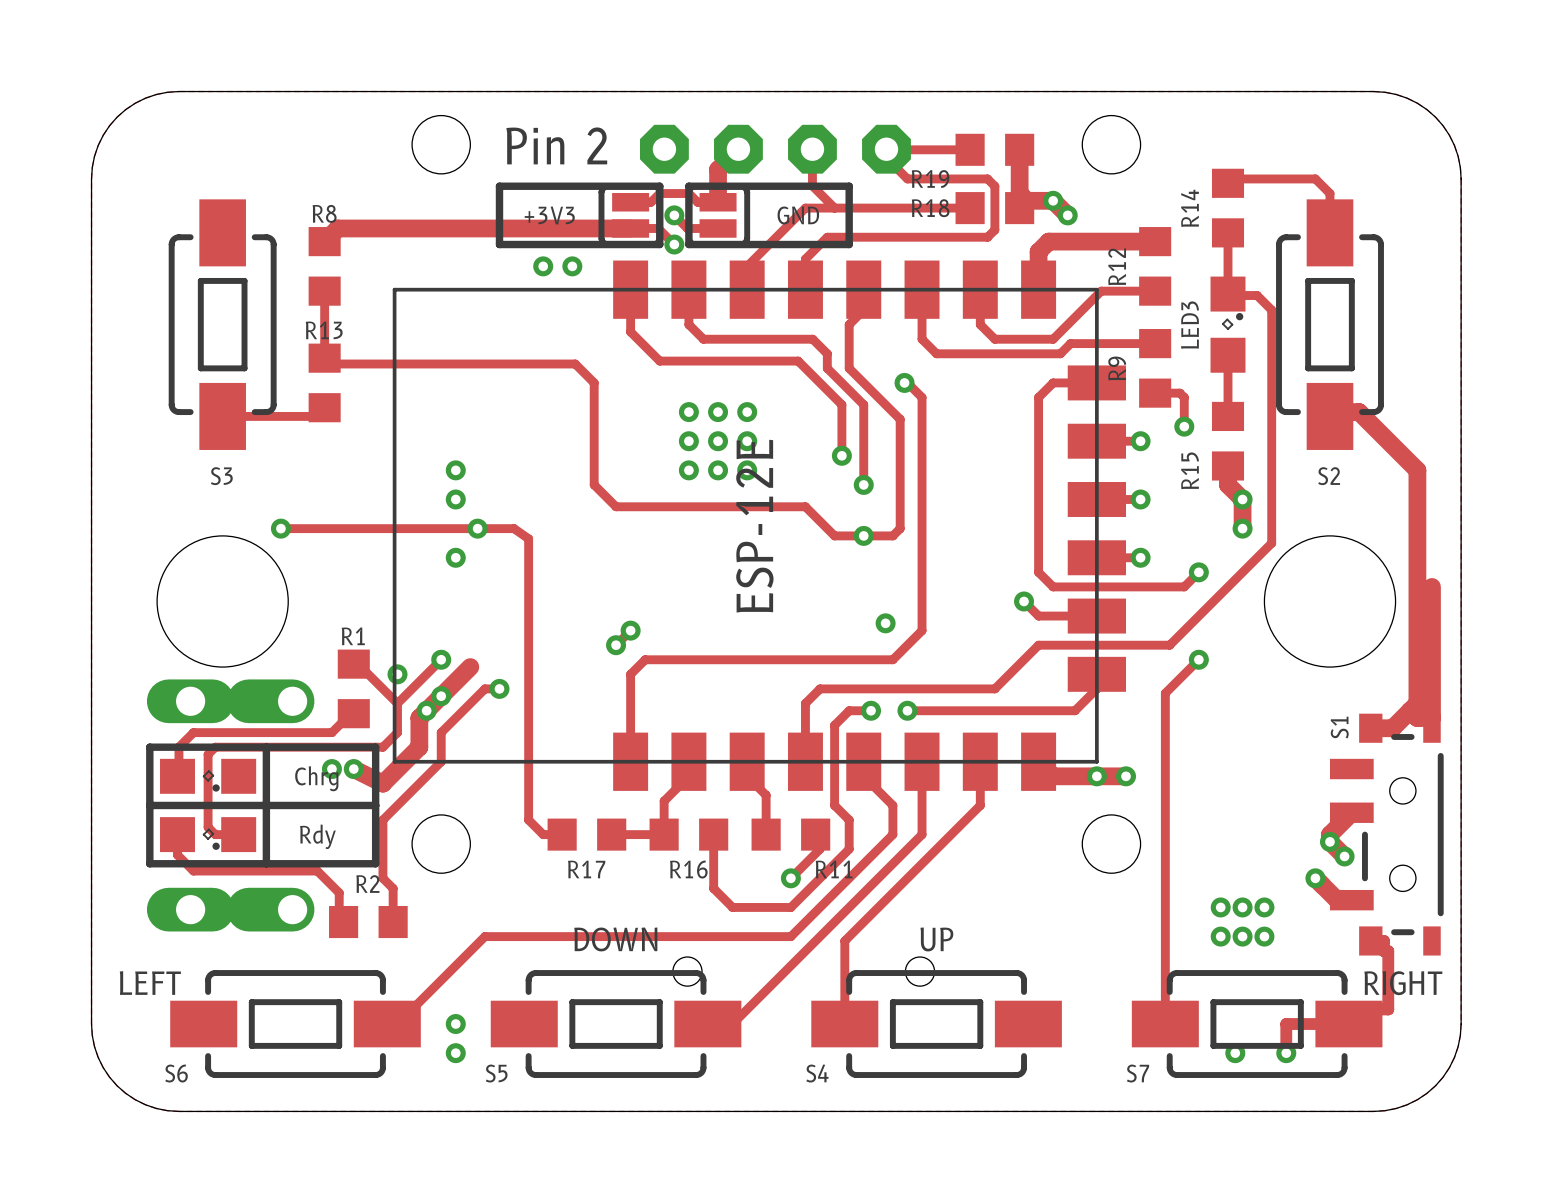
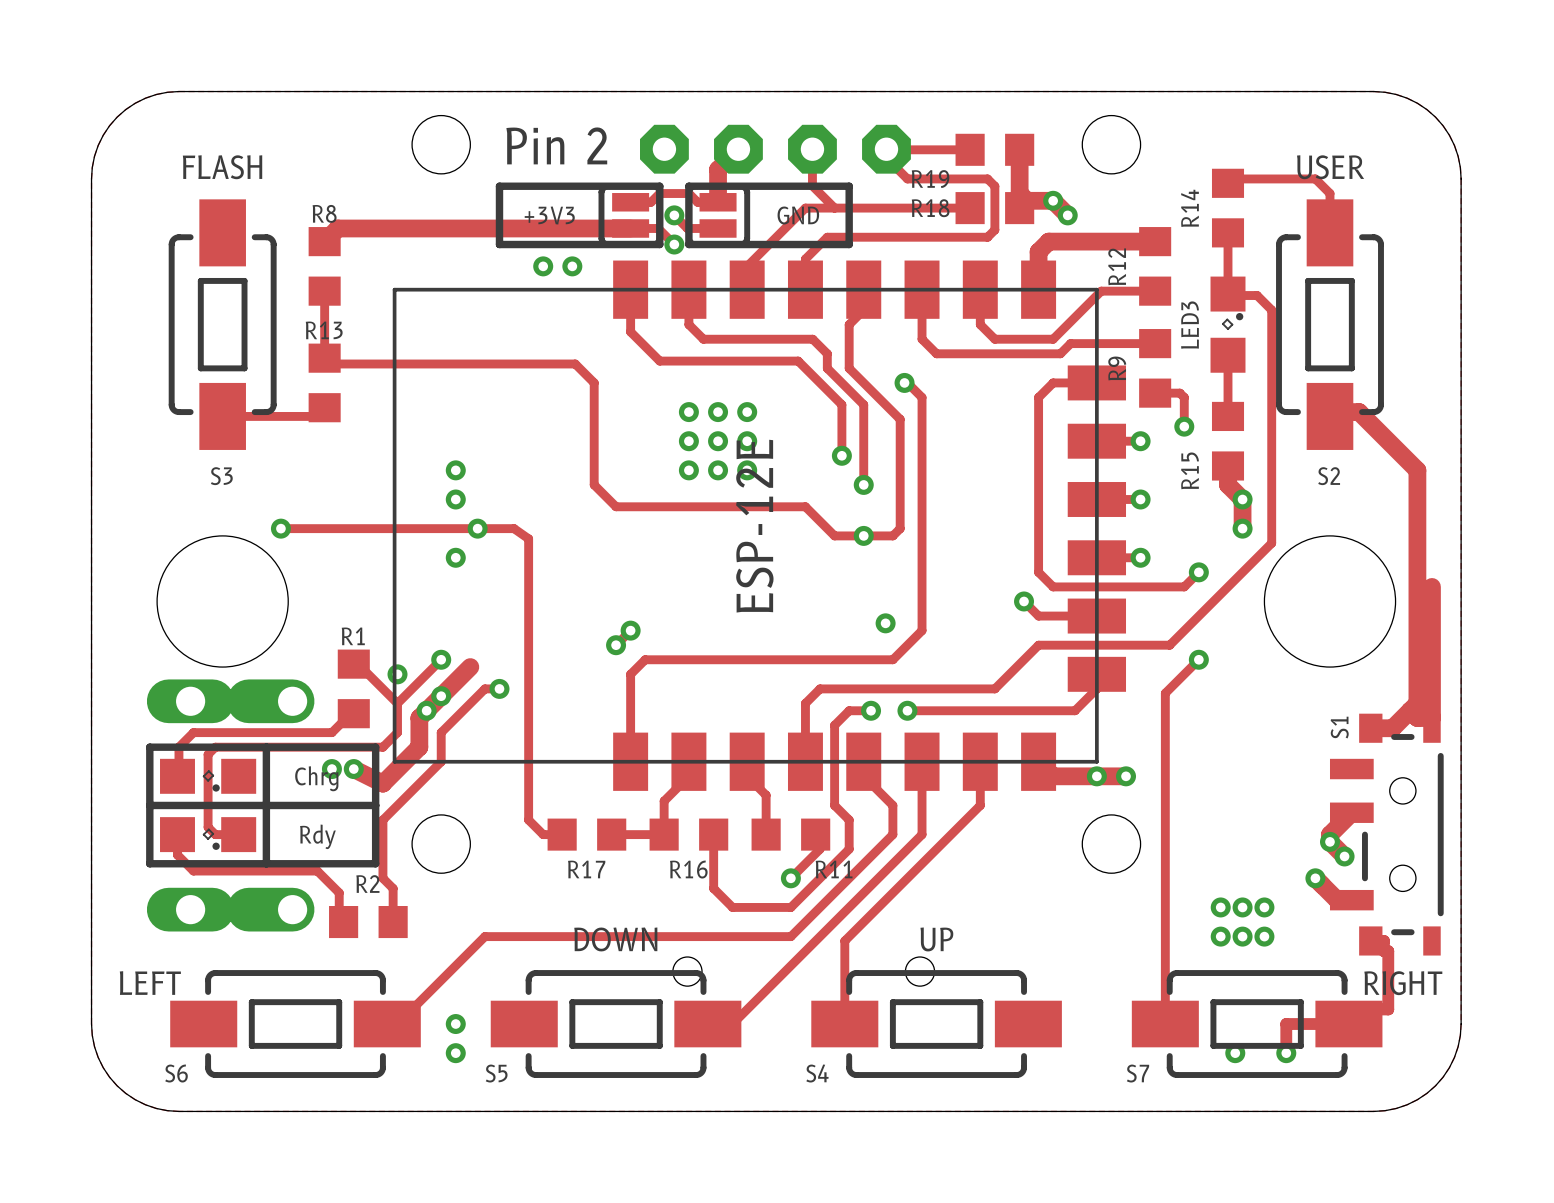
text: none -> FLASH (222, 167)
text: none -> USER (1330, 167)

